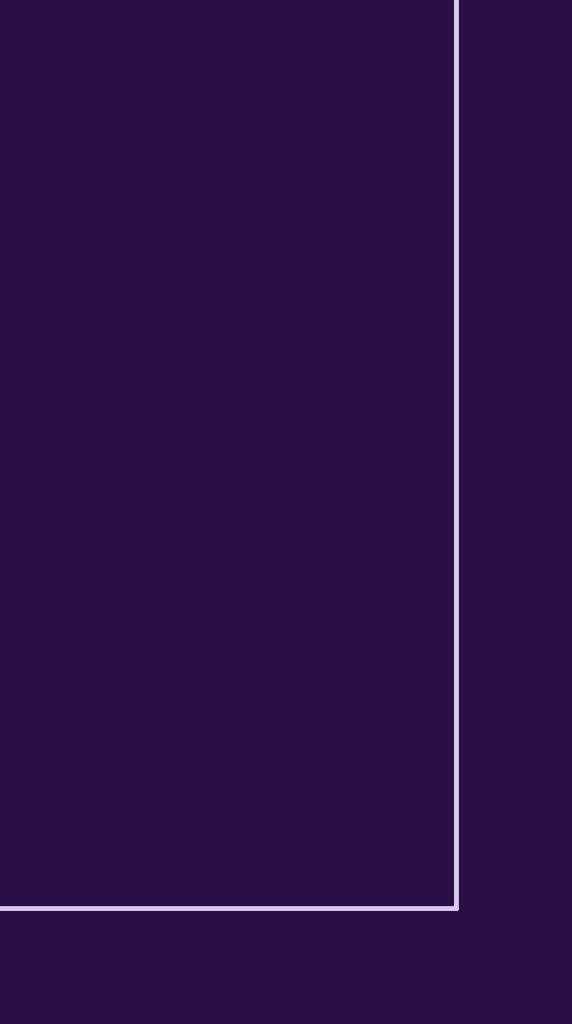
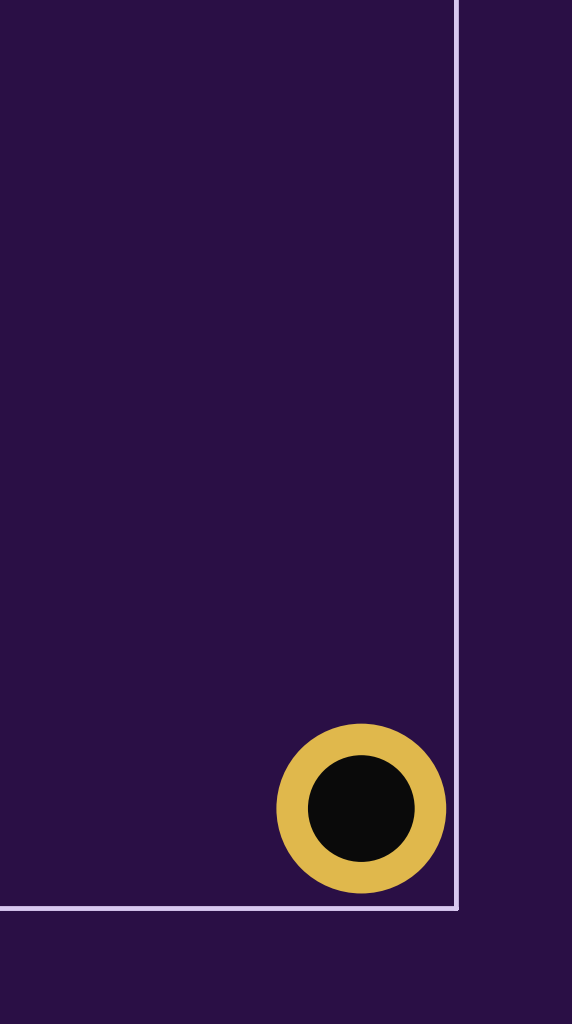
part: none -> (361, 808)

